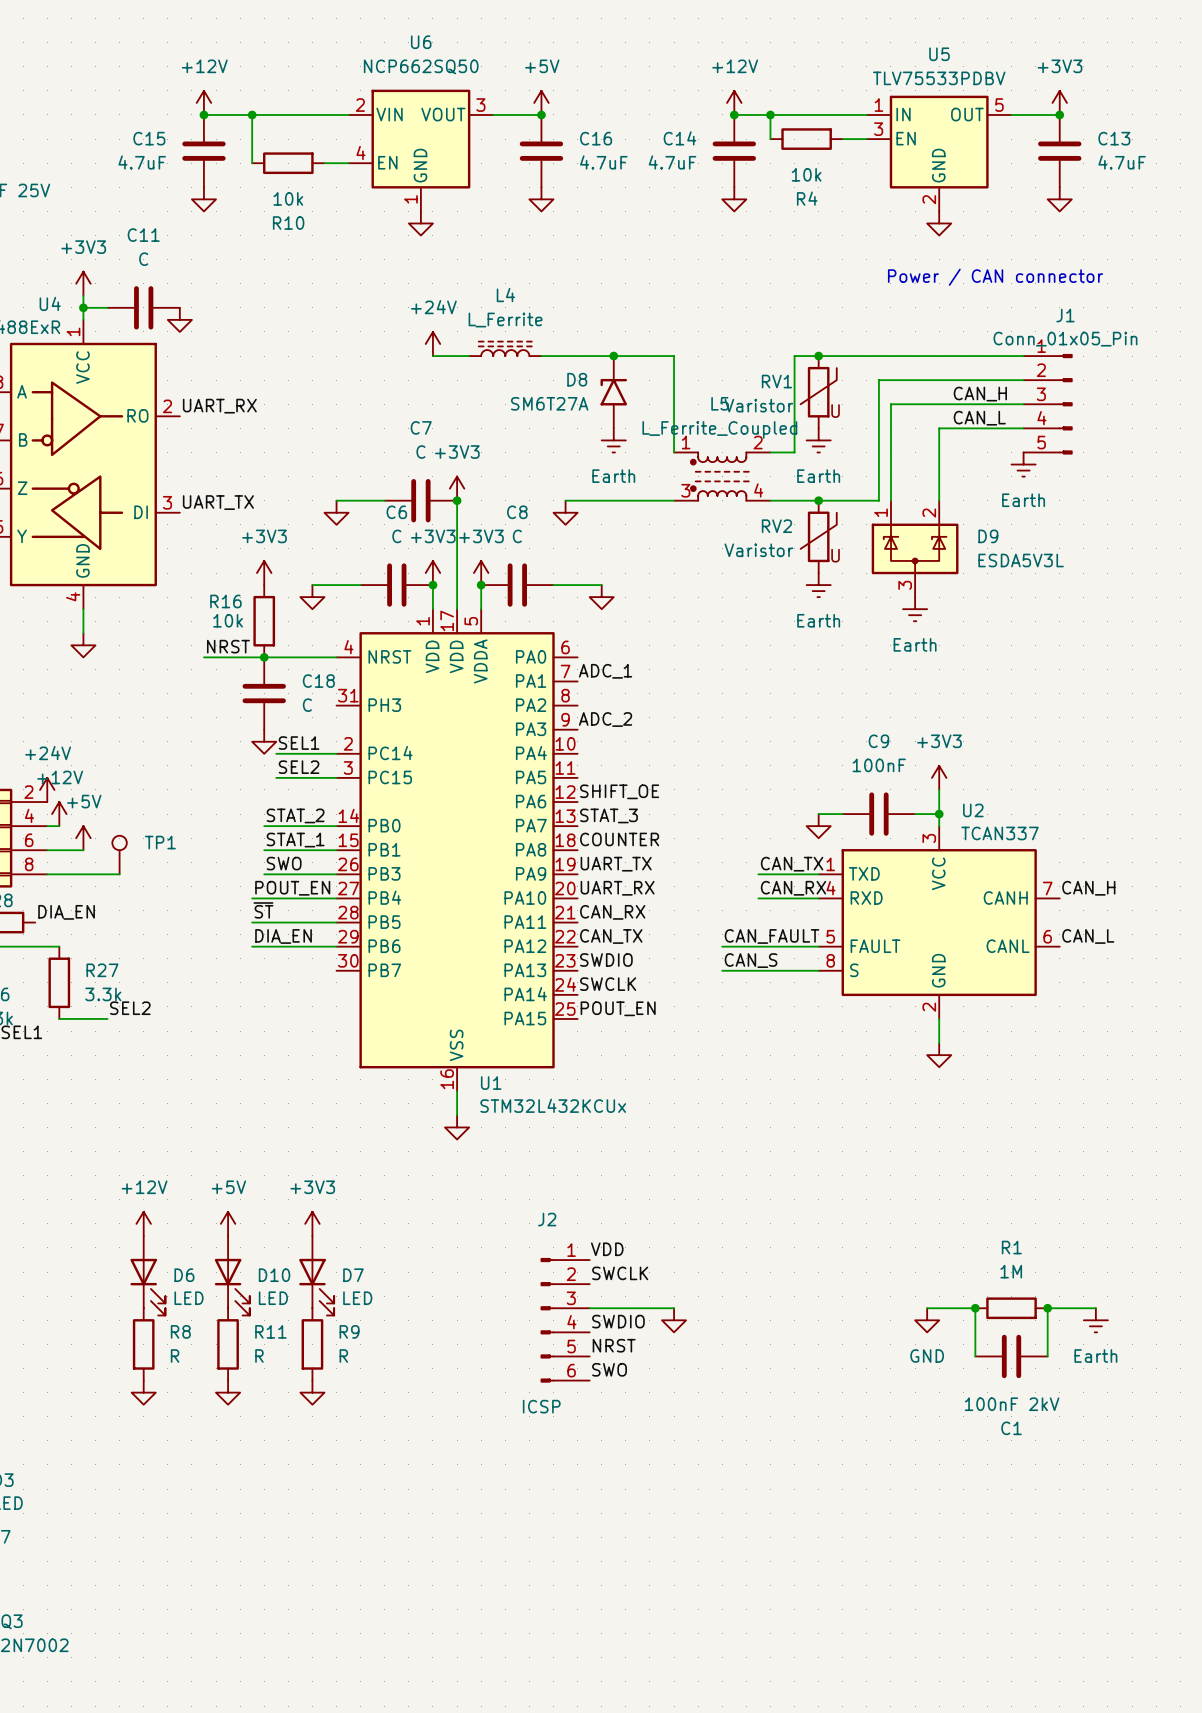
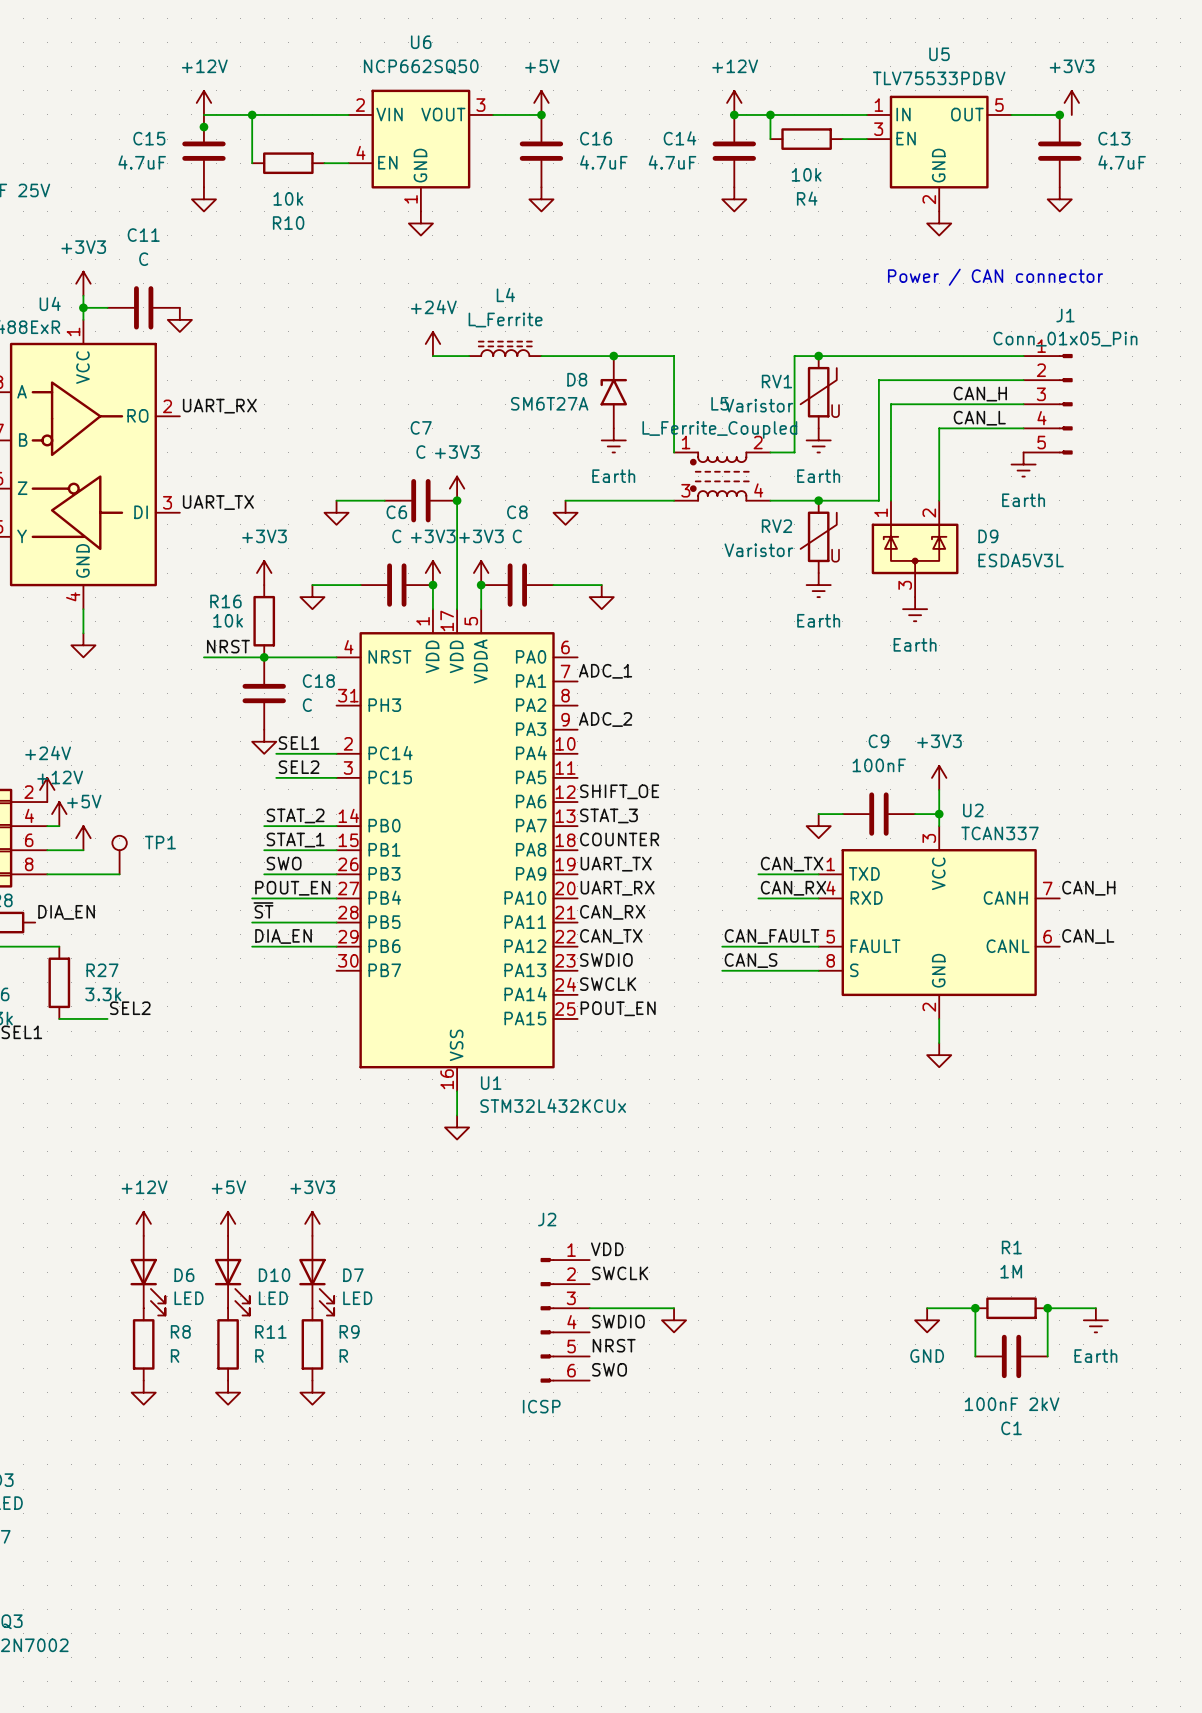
power symbol position: +3V3 (1059, 102) -> +3V3 (1071, 102)
junction position: (203, 114) -> (203, 127)

